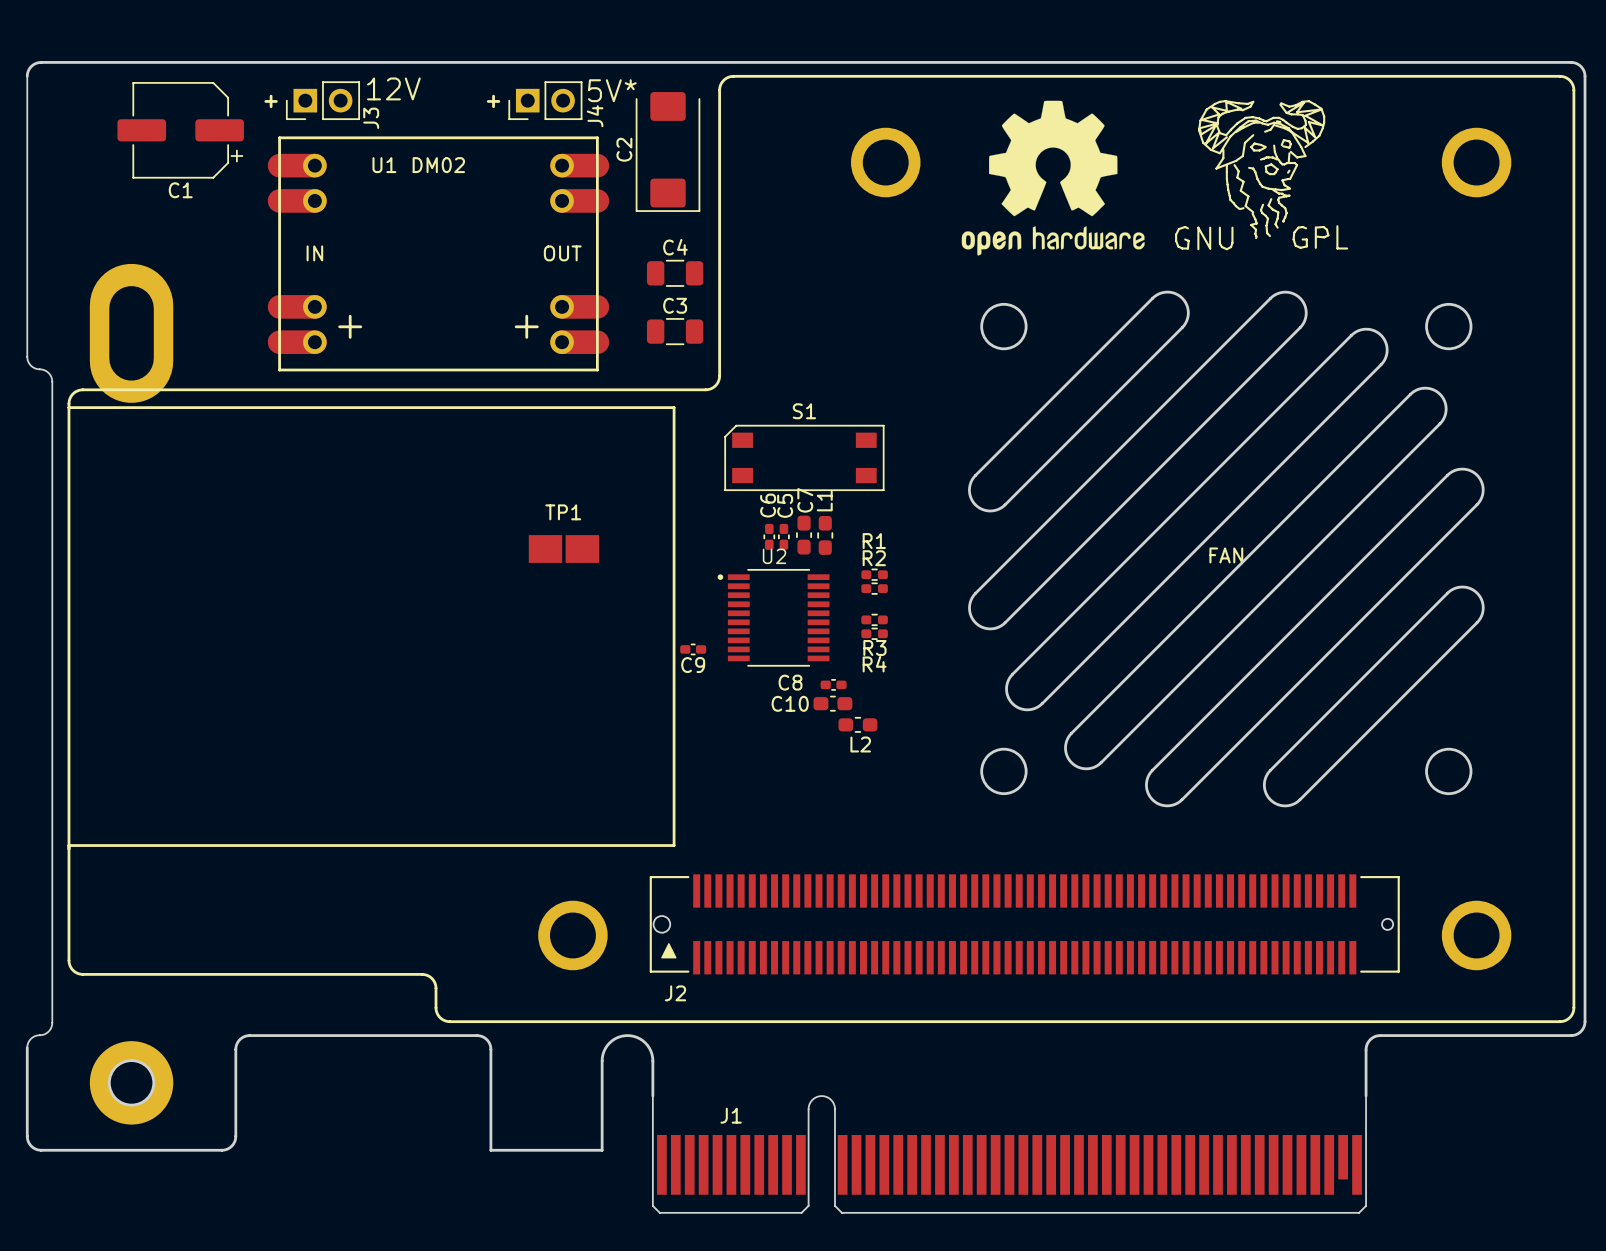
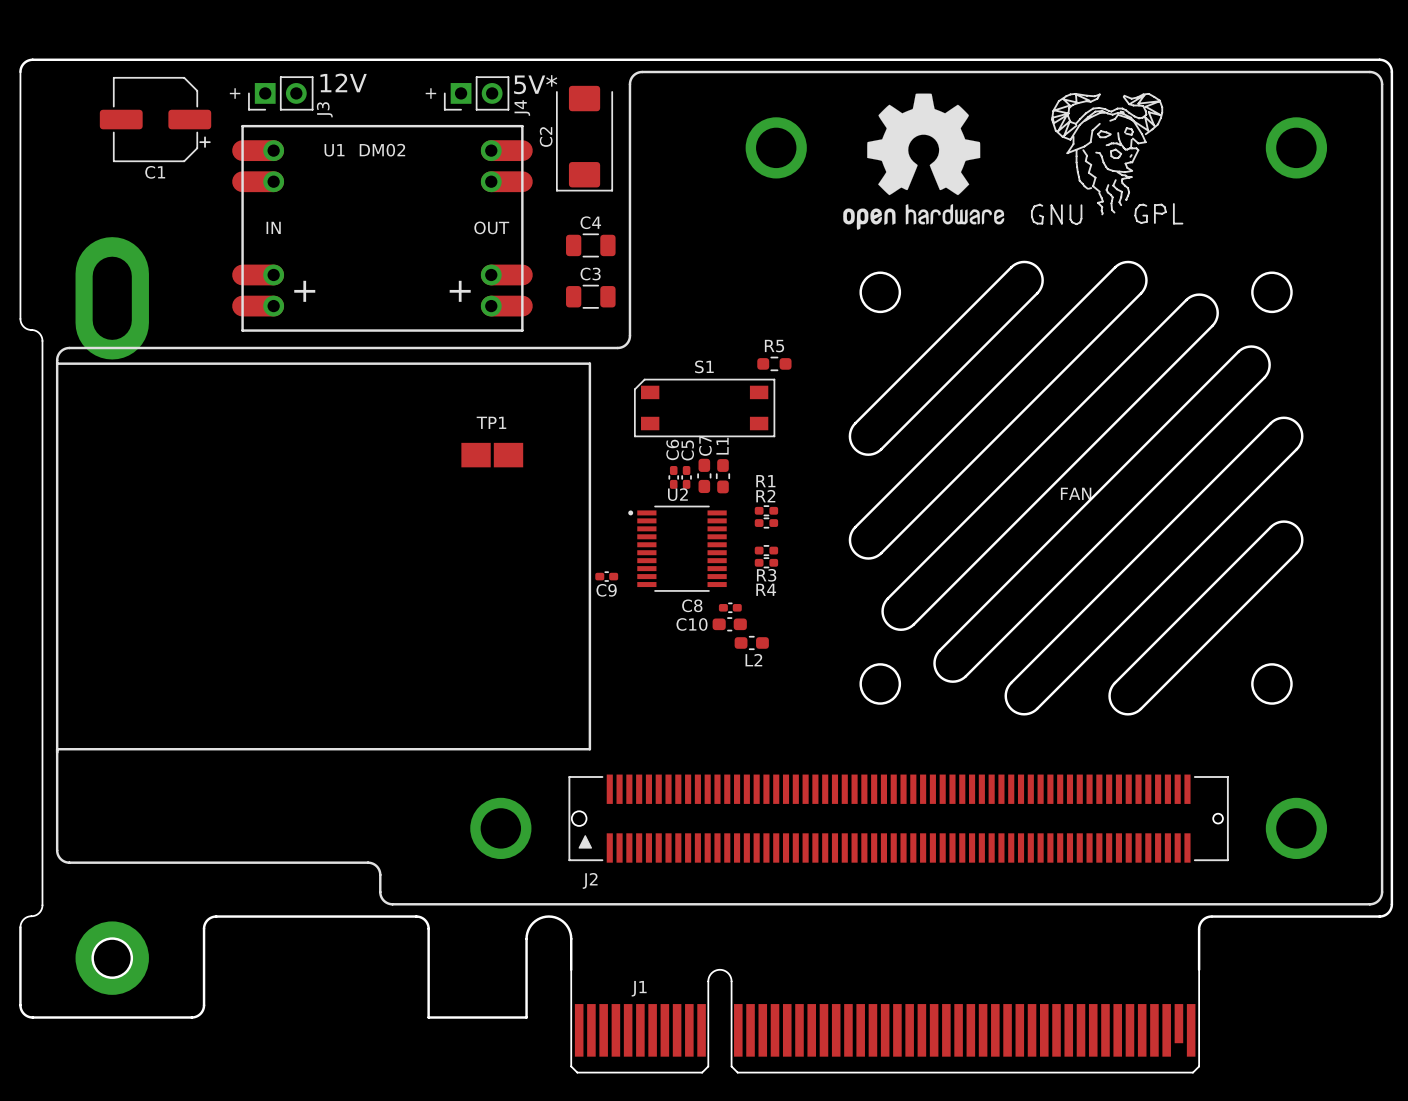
R5: none -> (774, 363)
TP1 position: (563, 549) -> (492, 455)

